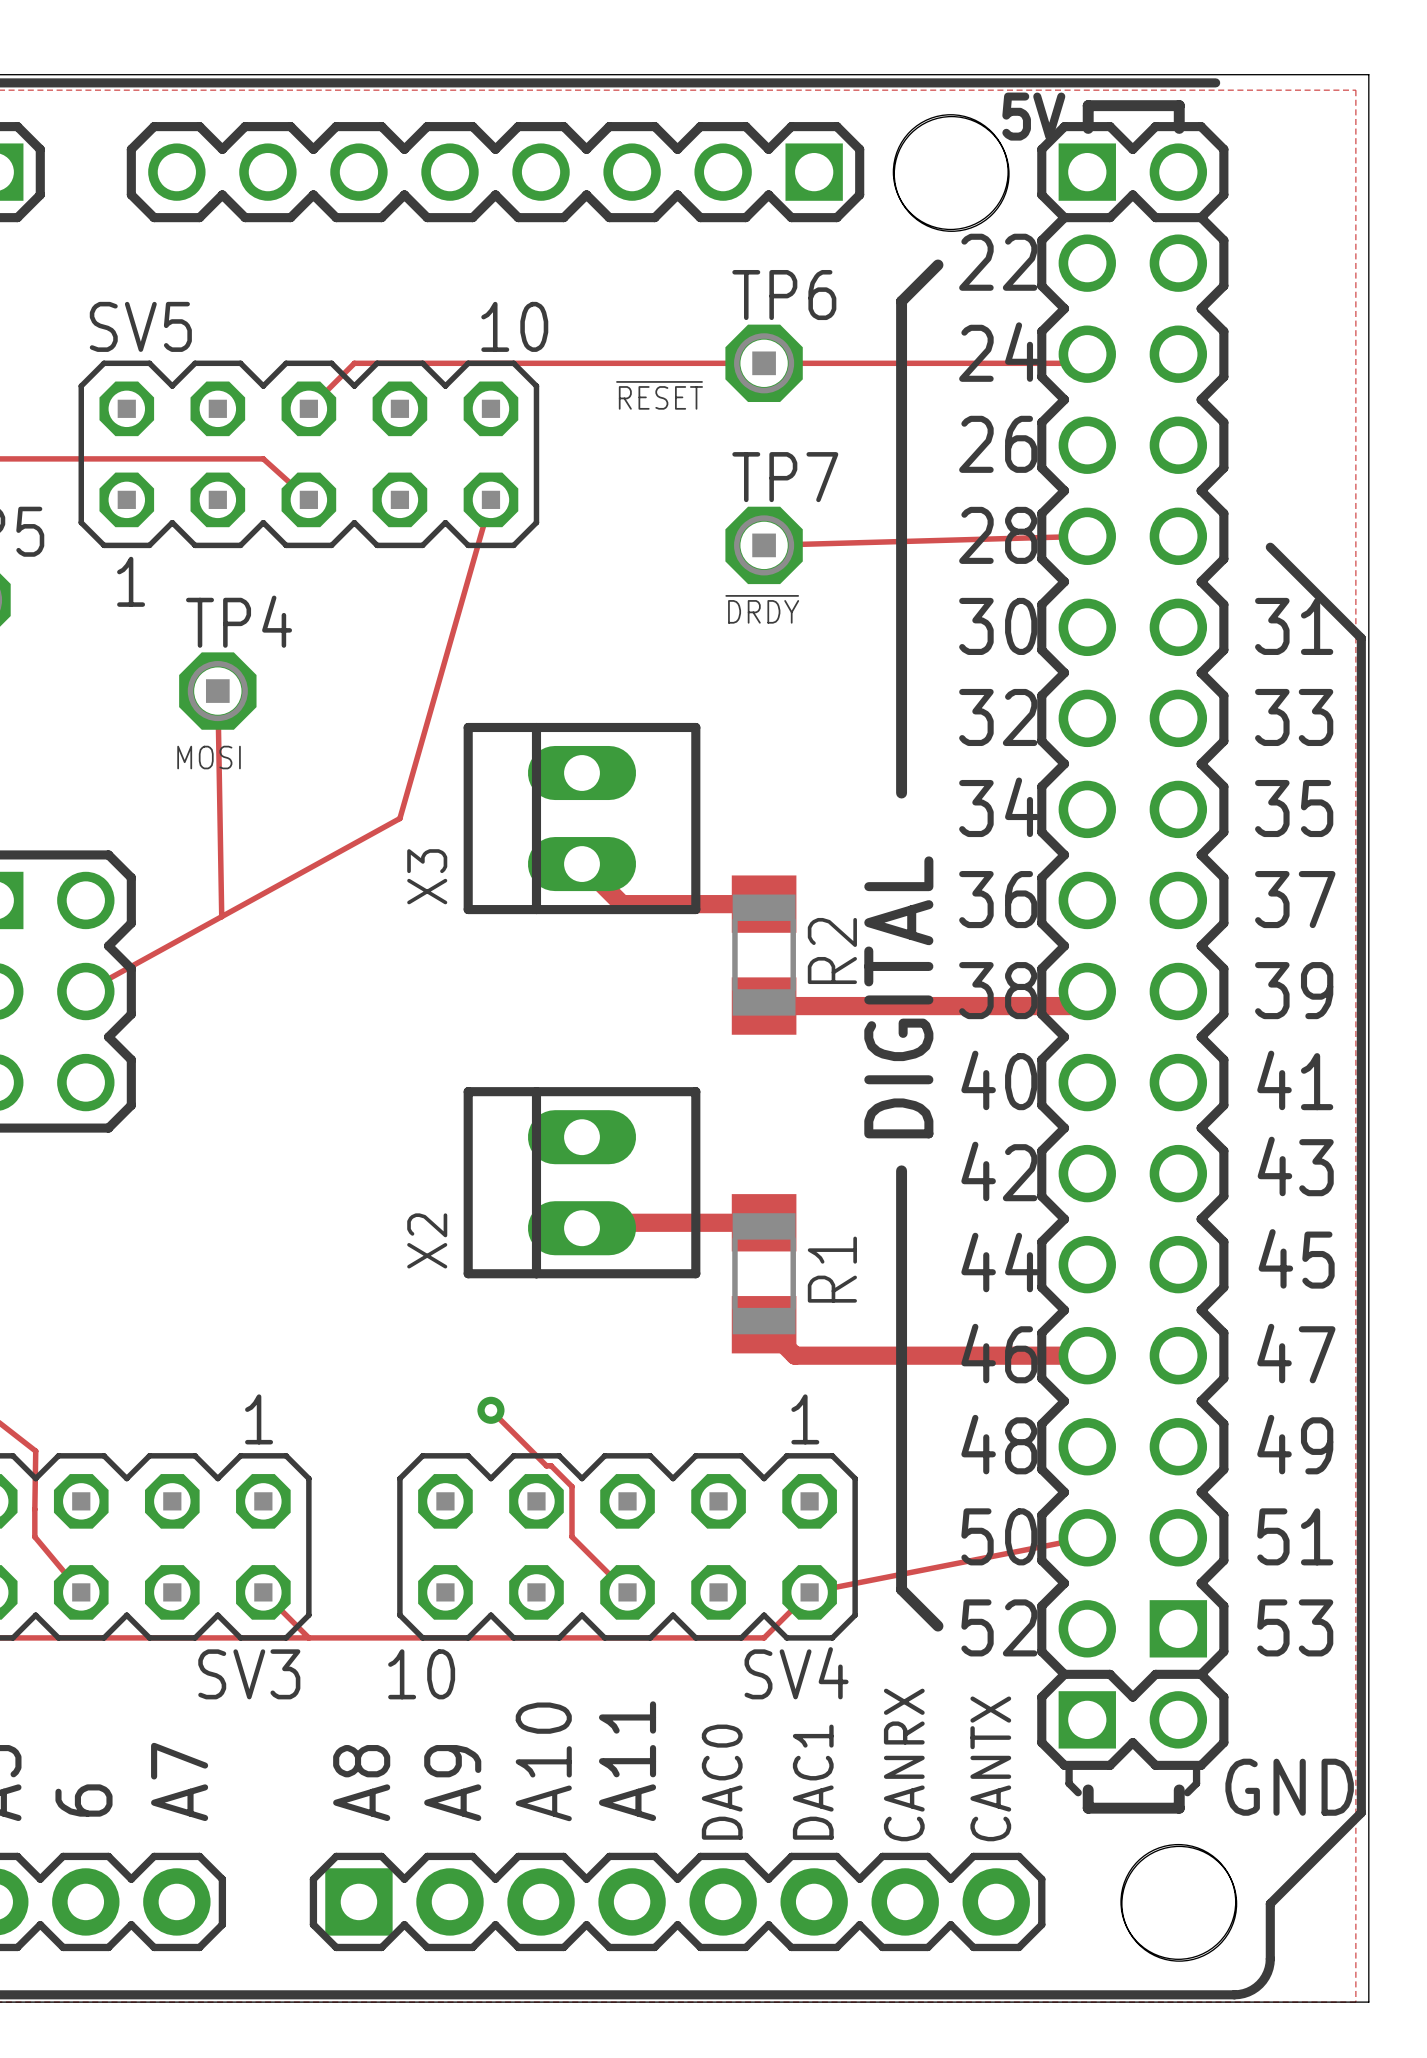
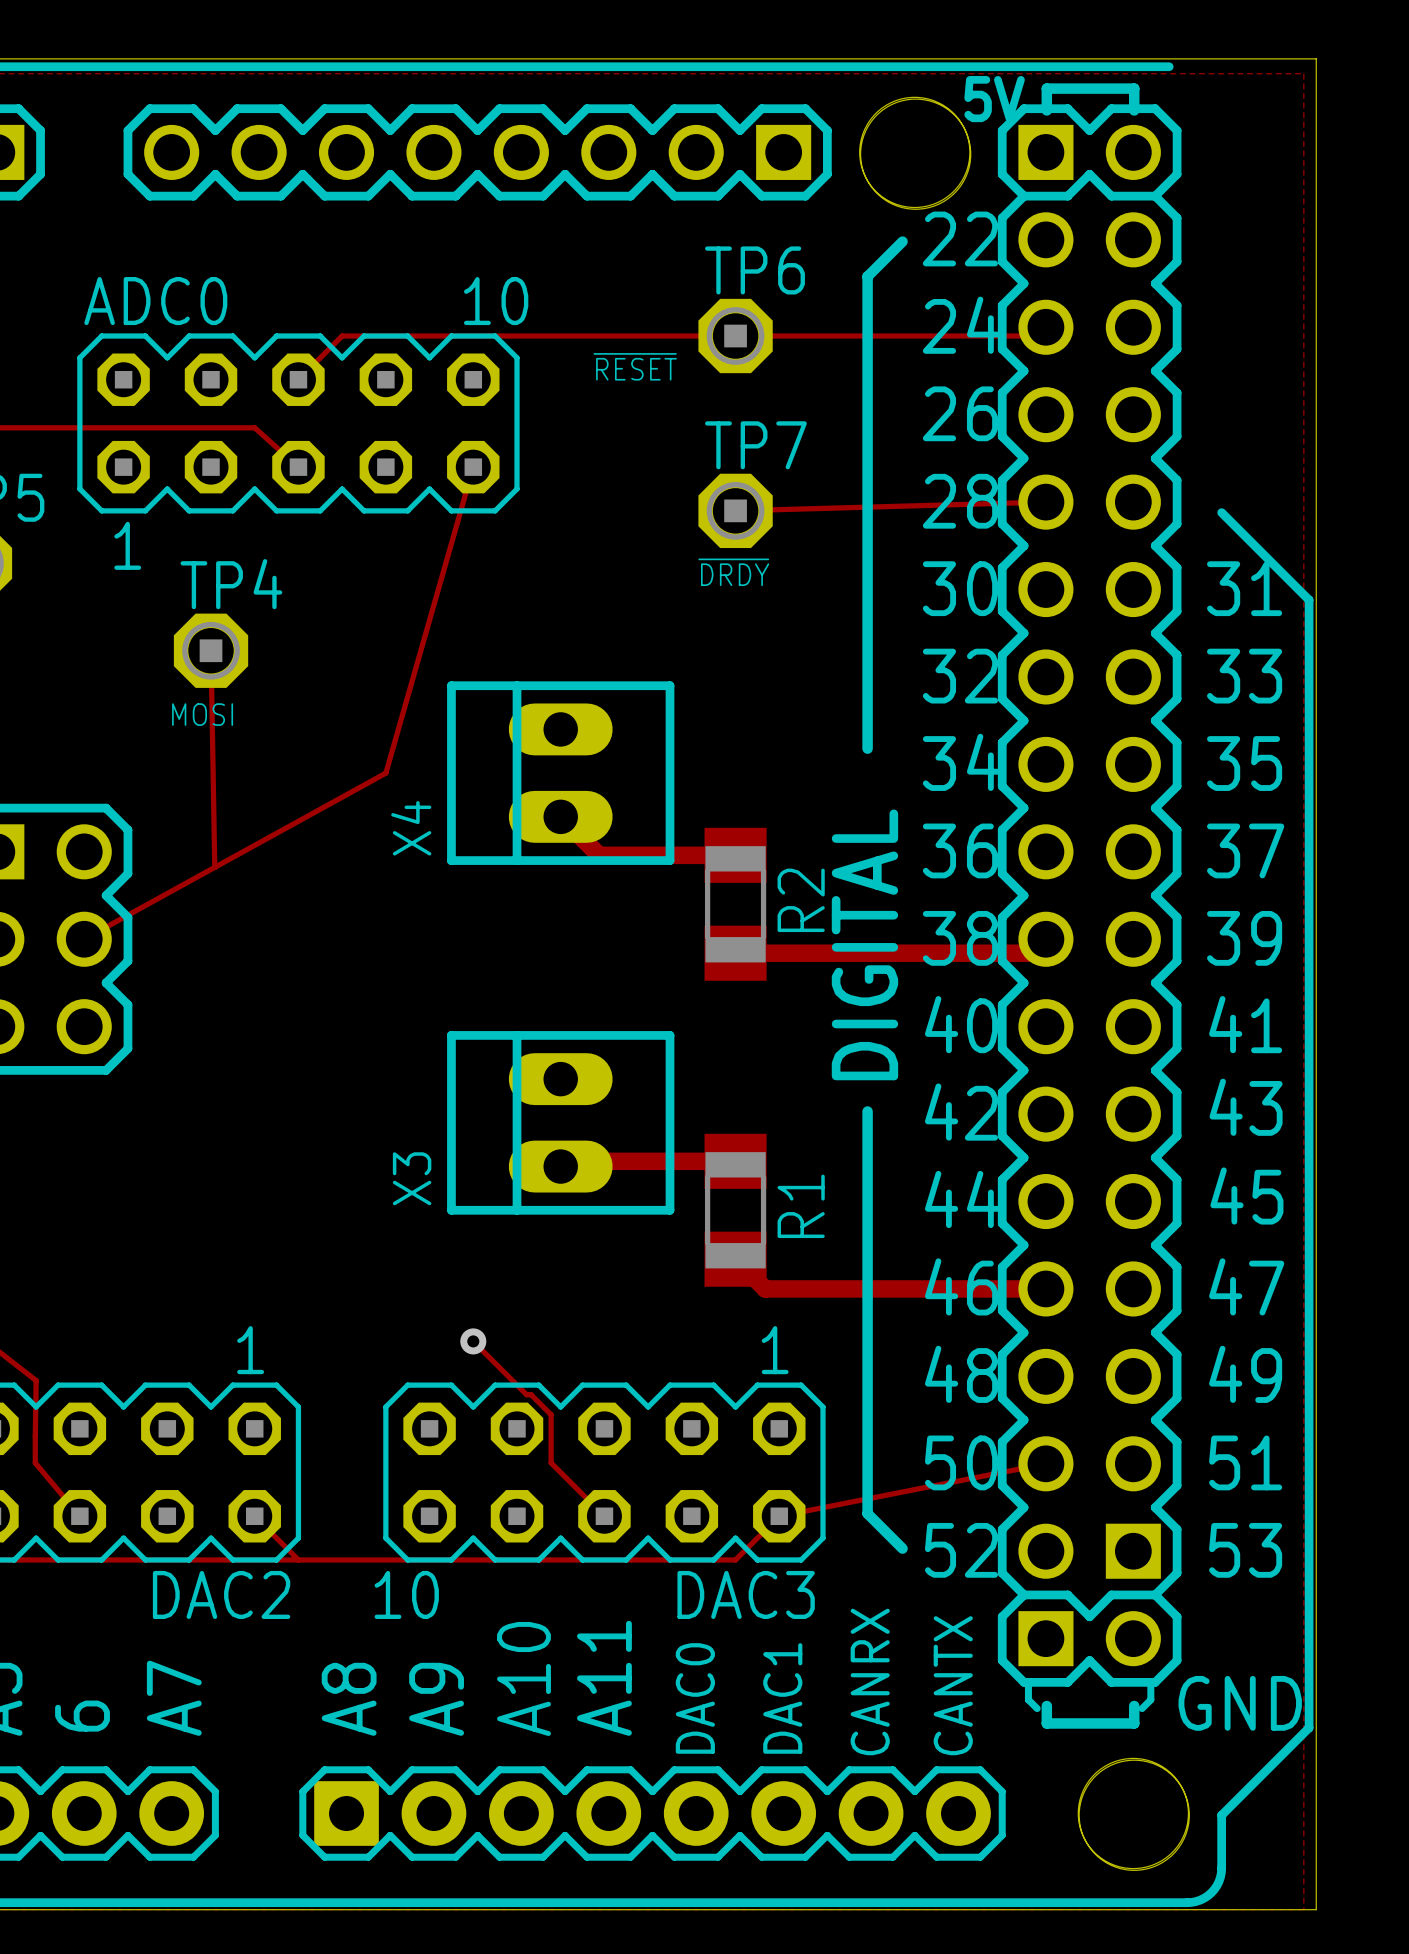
SV5 name: SV5 (140, 326) -> ADC0 (155, 301)
X3 name: X3 (427, 876) -> X4 (411, 828)
X2 name: X2 (427, 1240) -> X3 (412, 1178)
SV4 name: SV4 (796, 1673) -> DAC3 (746, 1594)
SV3 name: SV3 (249, 1674) -> DAC2 (221, 1594)

